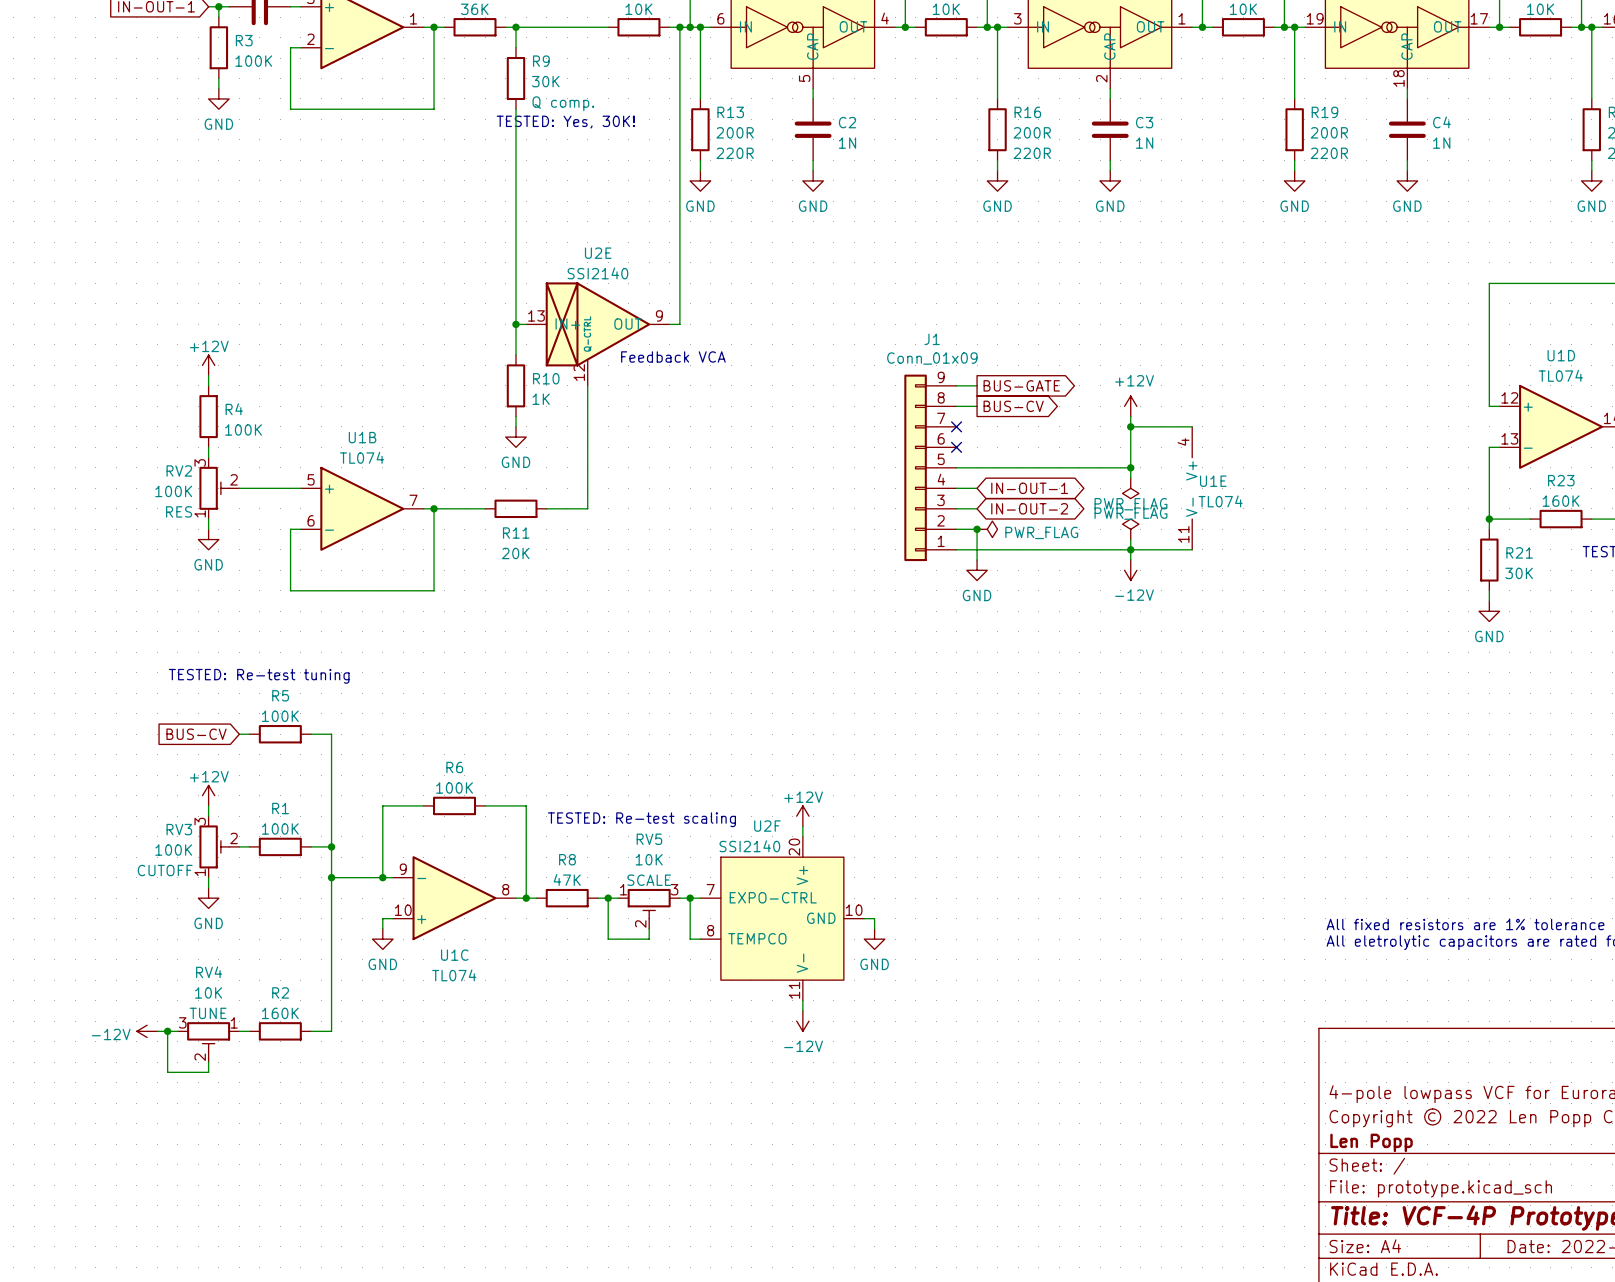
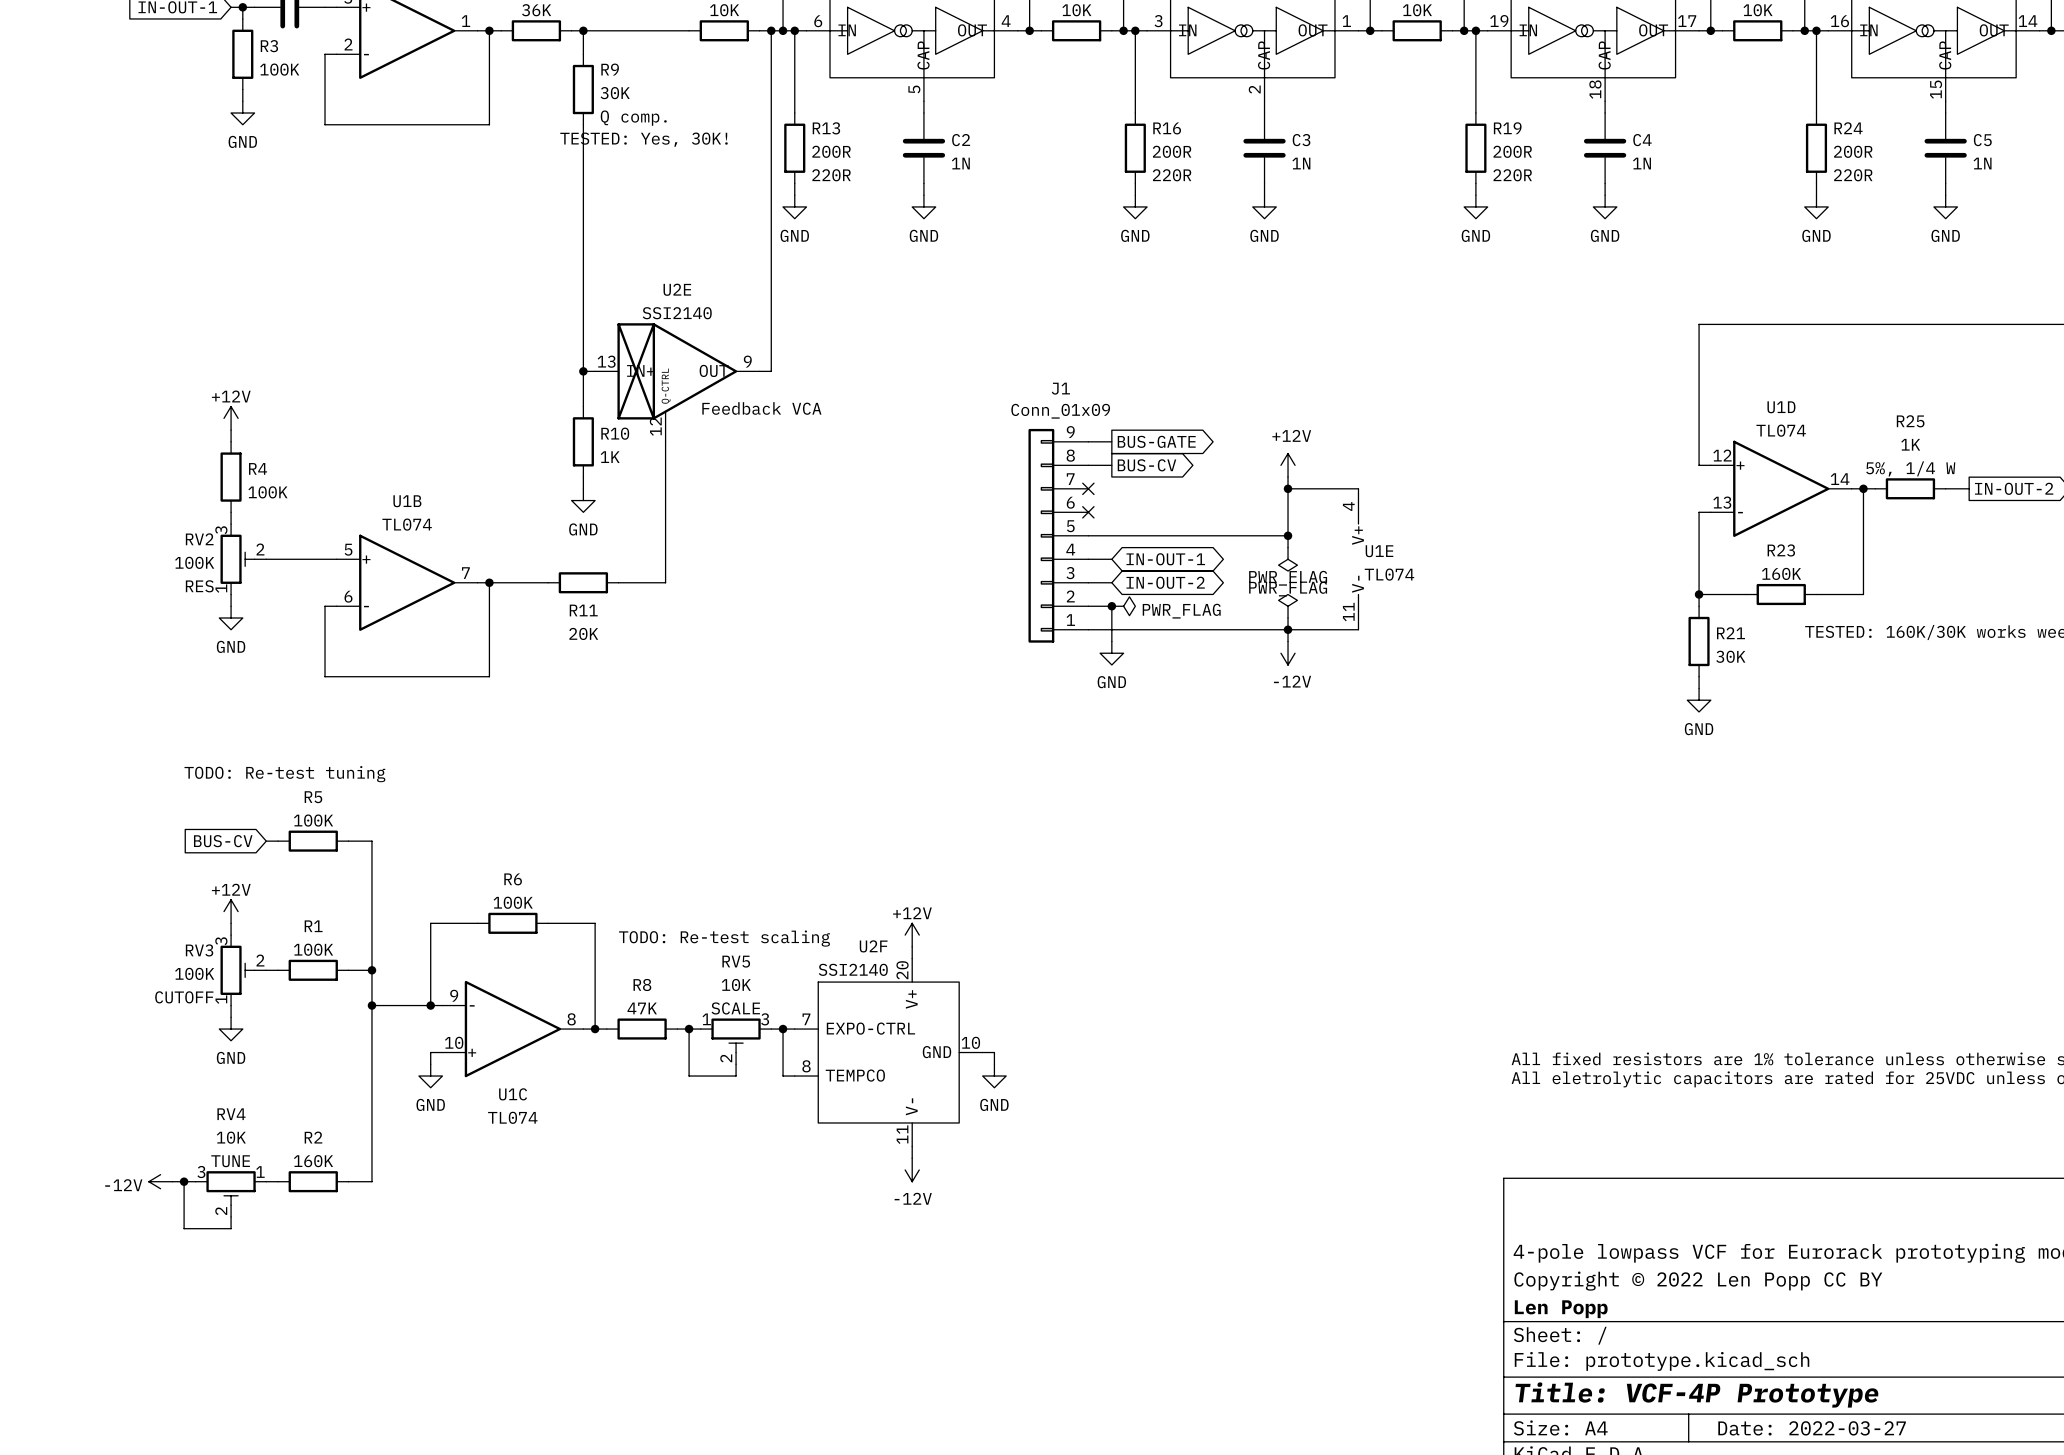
text: TESTED: Re-test tuning (259, 676) -> TODO: Re-test tuning (284, 774)
text: TESTED: Re-test scaling (641, 819) -> TODO: Re-test scaling (724, 938)

